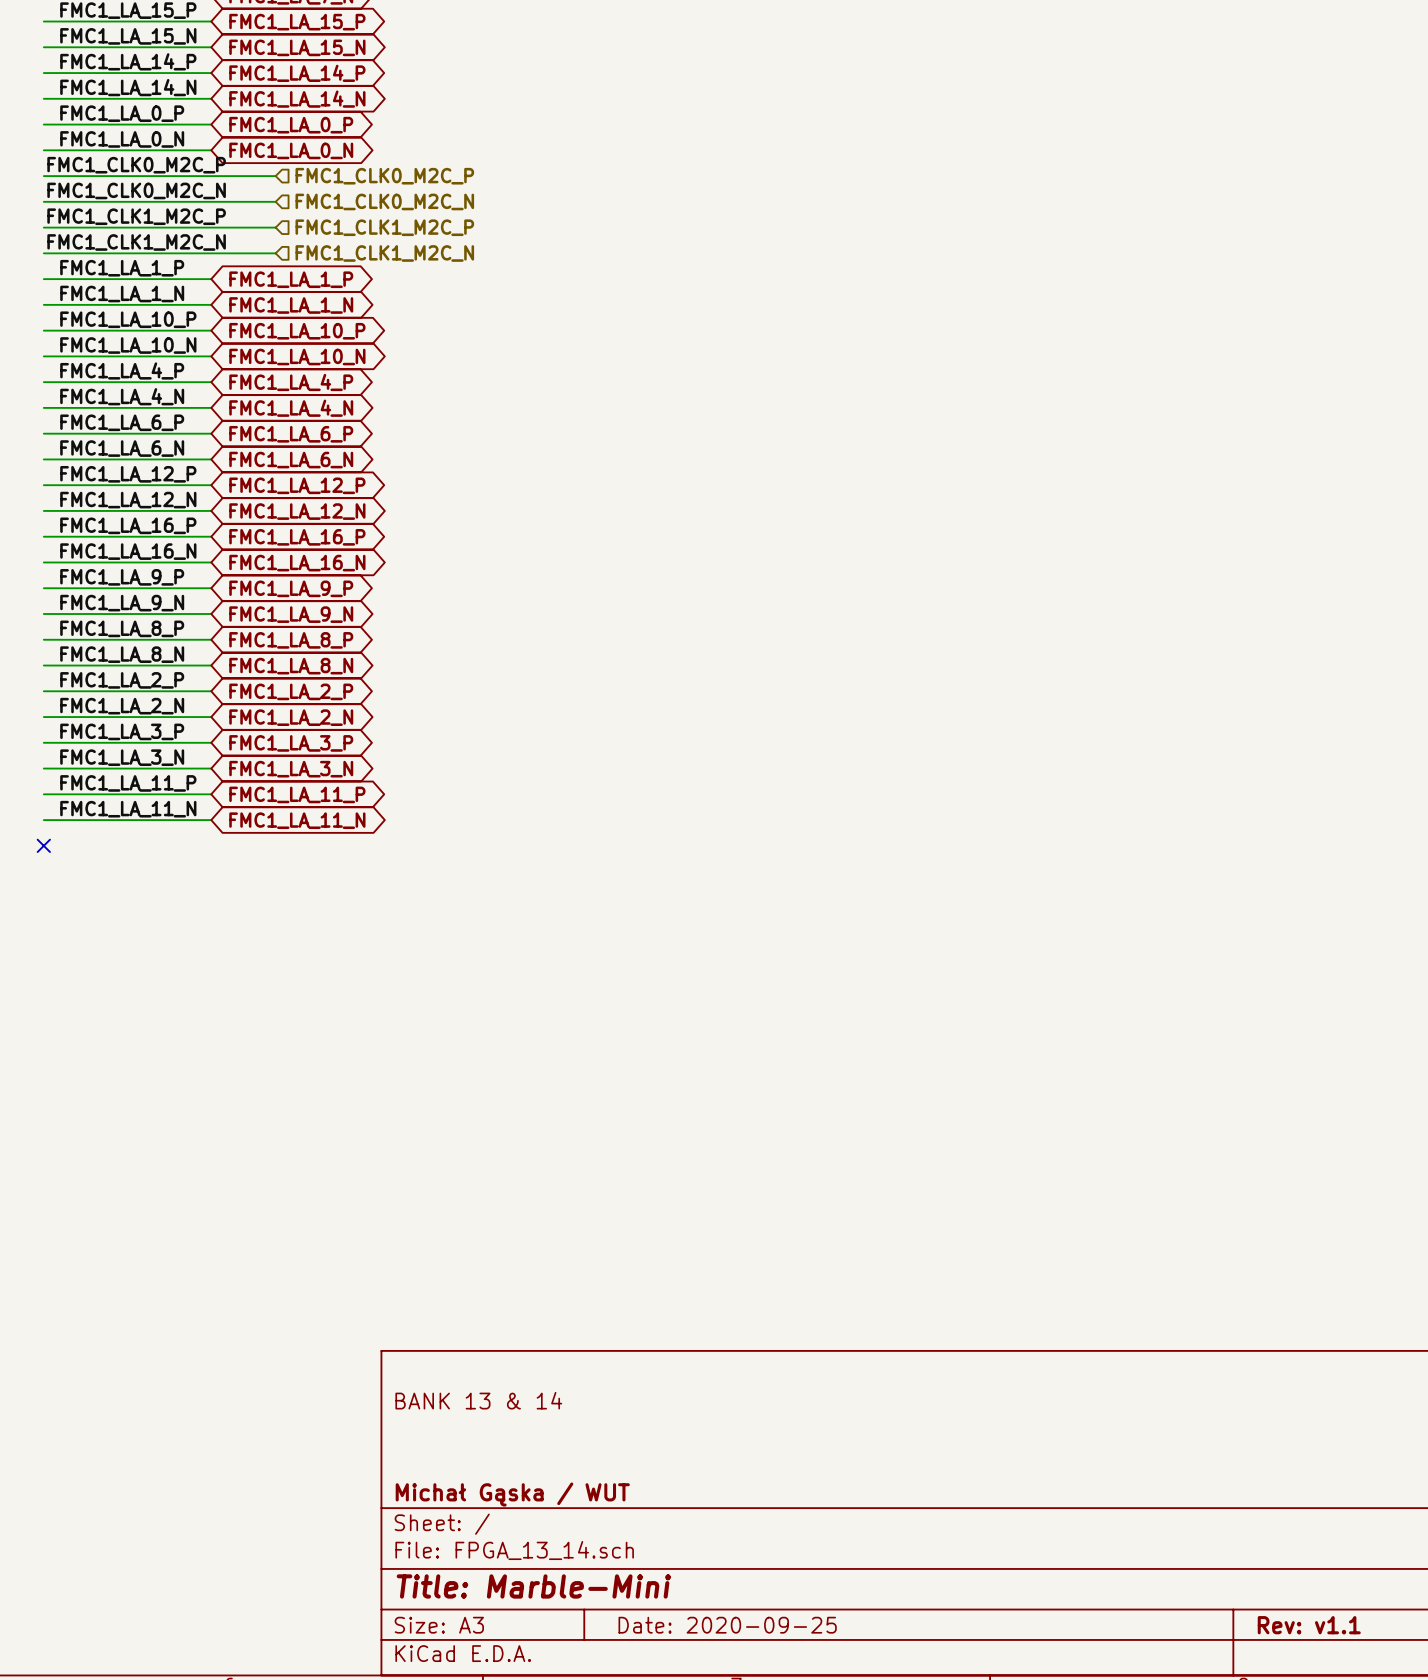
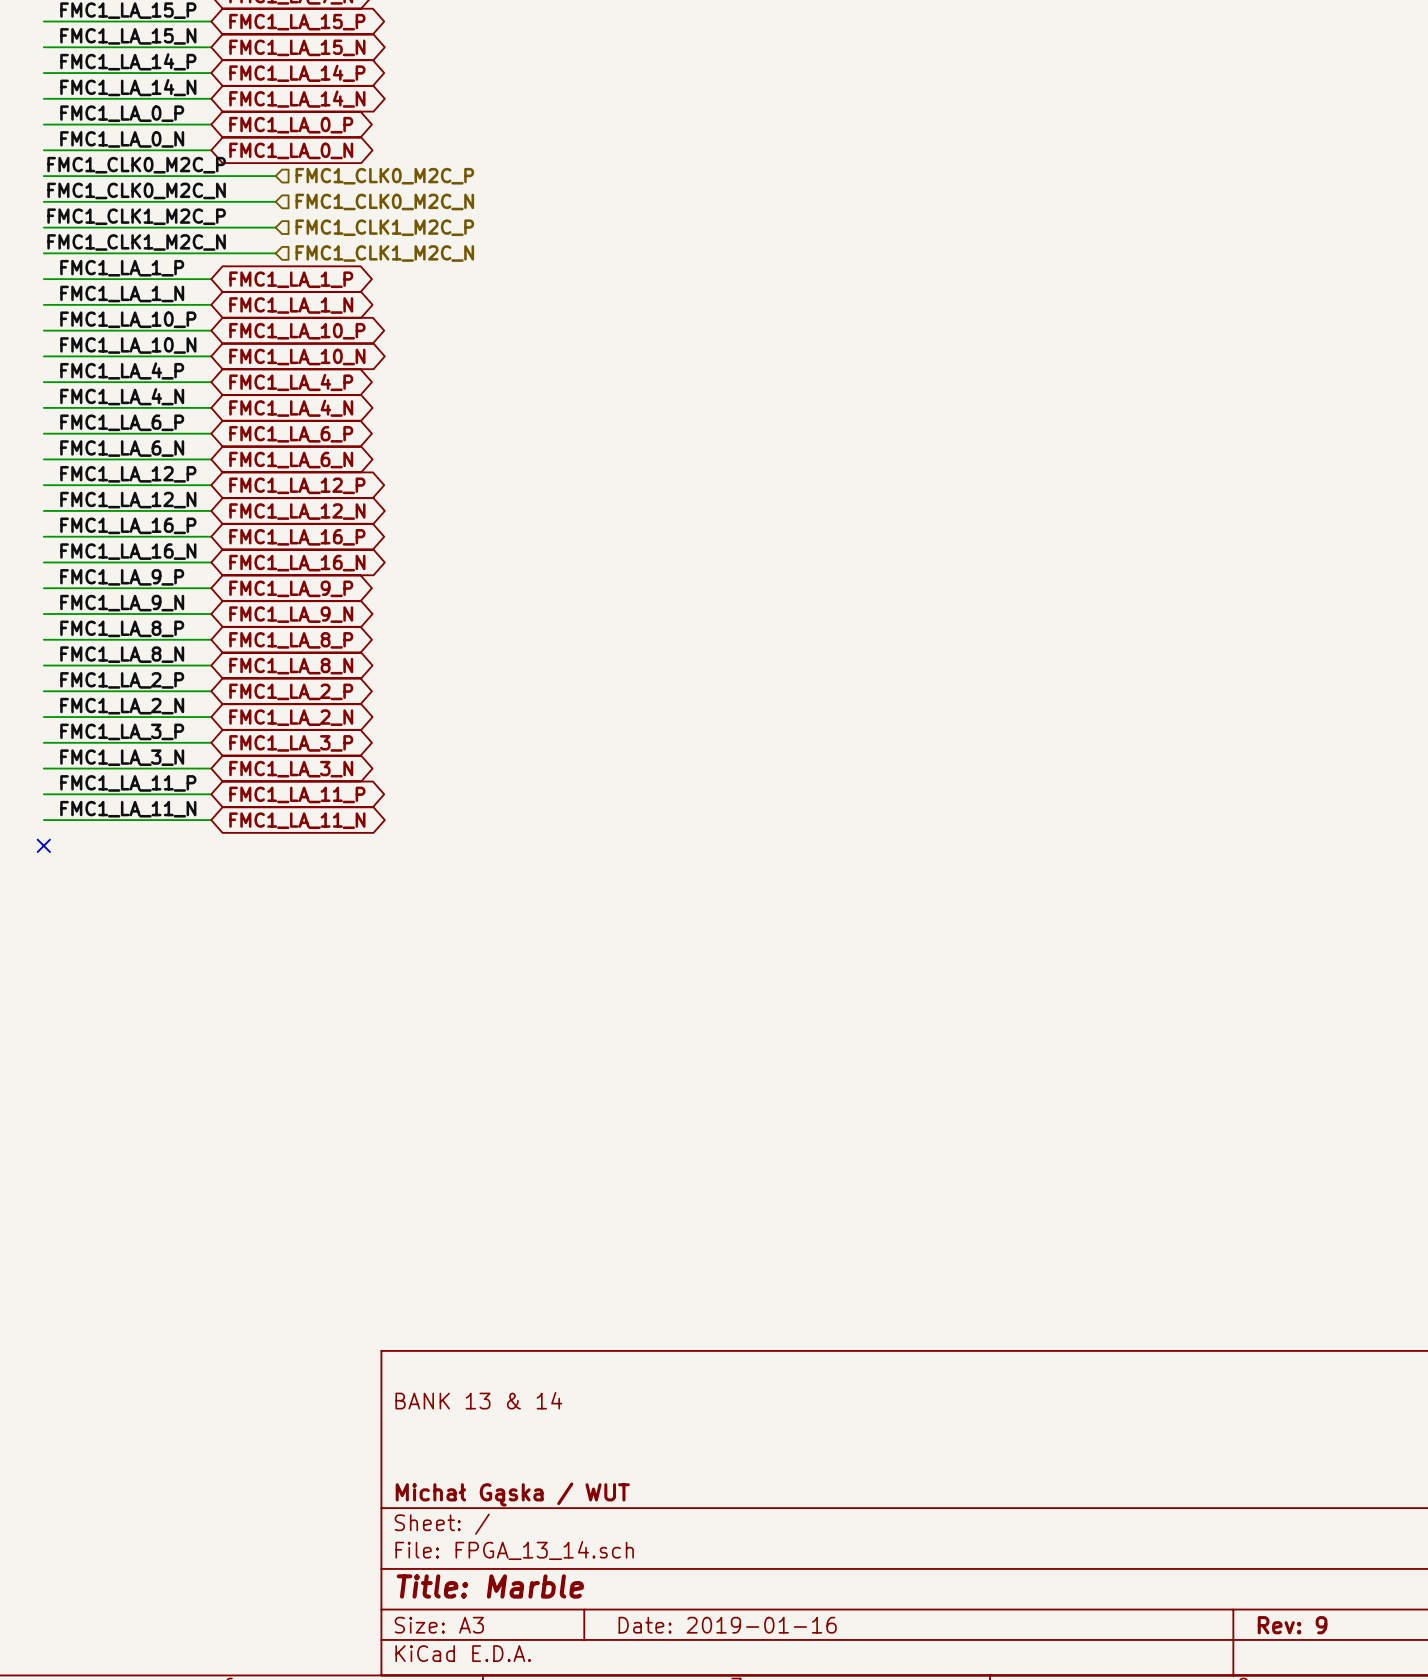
title block: Title: Marble-Mini (533, 1586) -> Title: Marble (490, 1586)
title block: Date: 2020-09-25 (727, 1625) -> Date: 2019-01-16 (727, 1625)
title block: Rev: v1.1 (1309, 1625) -> Rev: 9 (1292, 1625)

